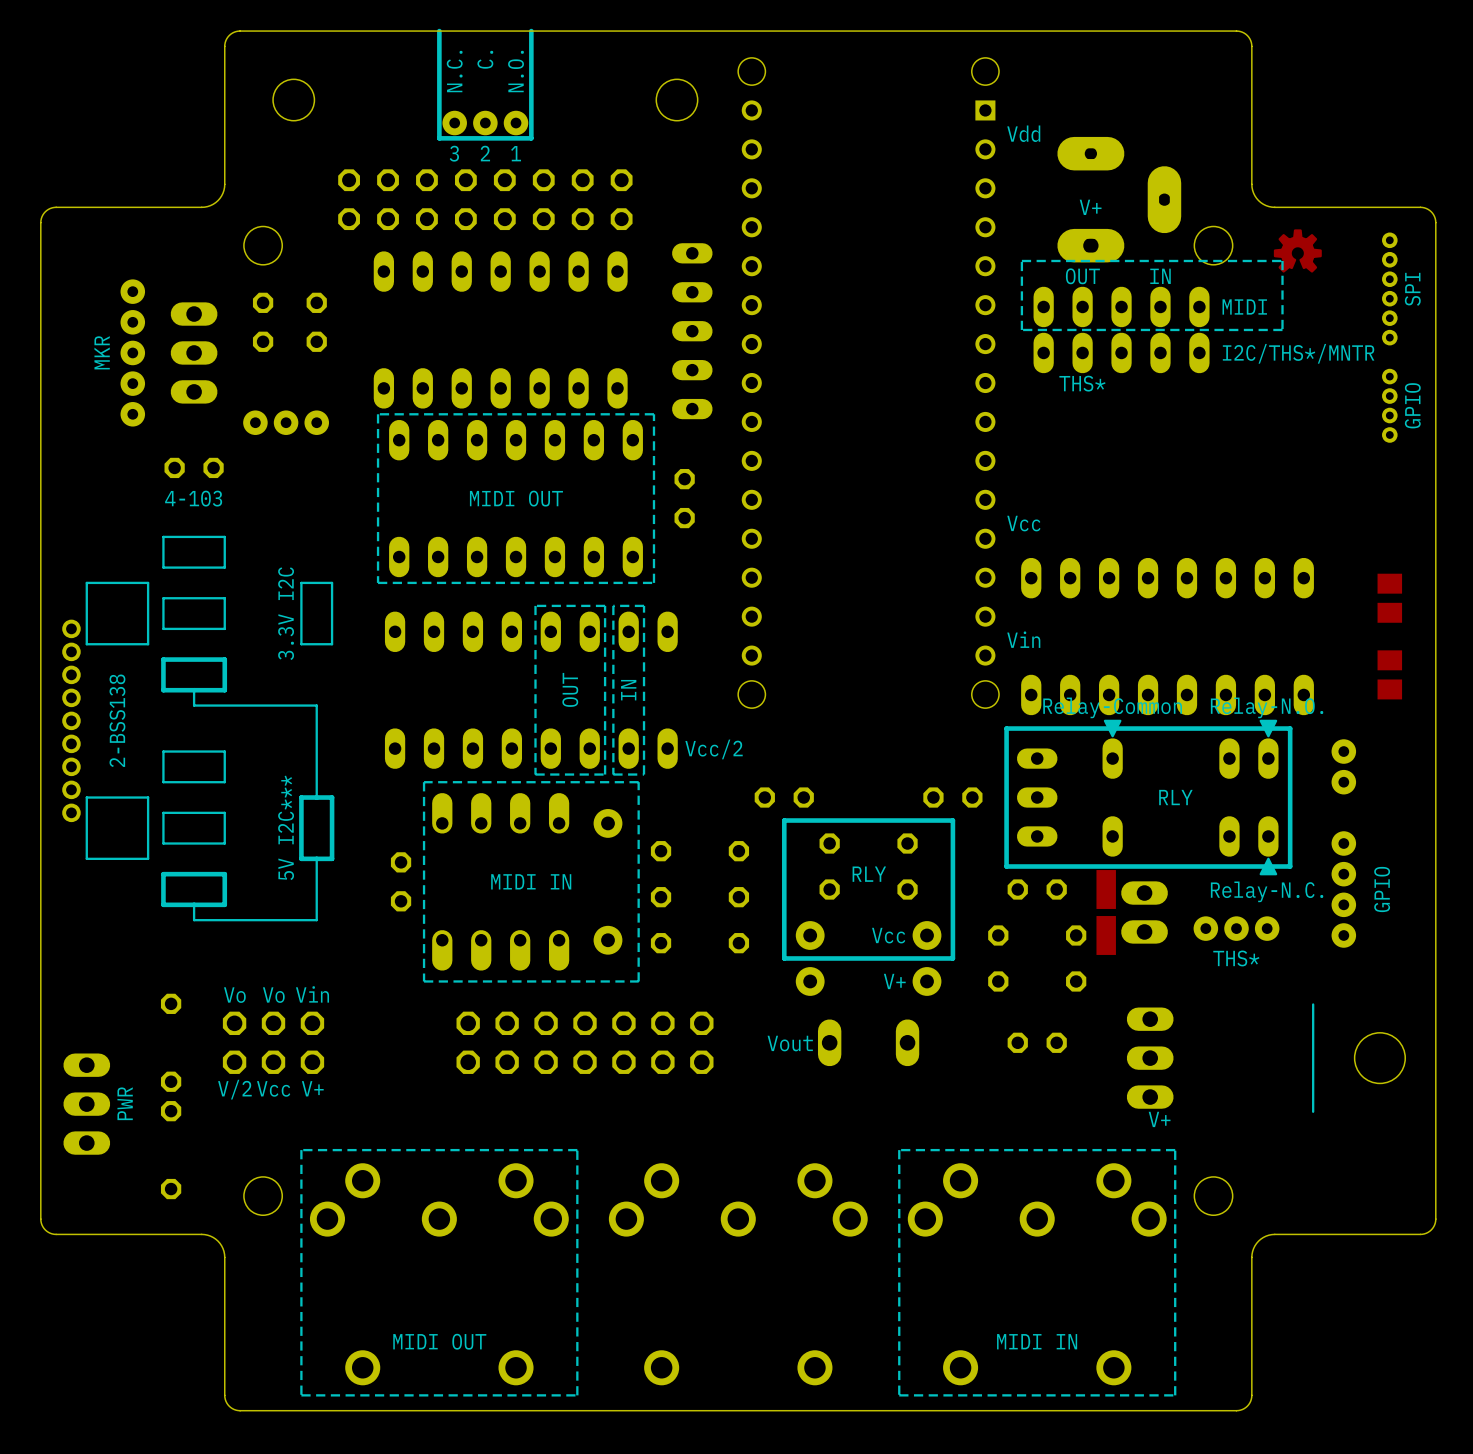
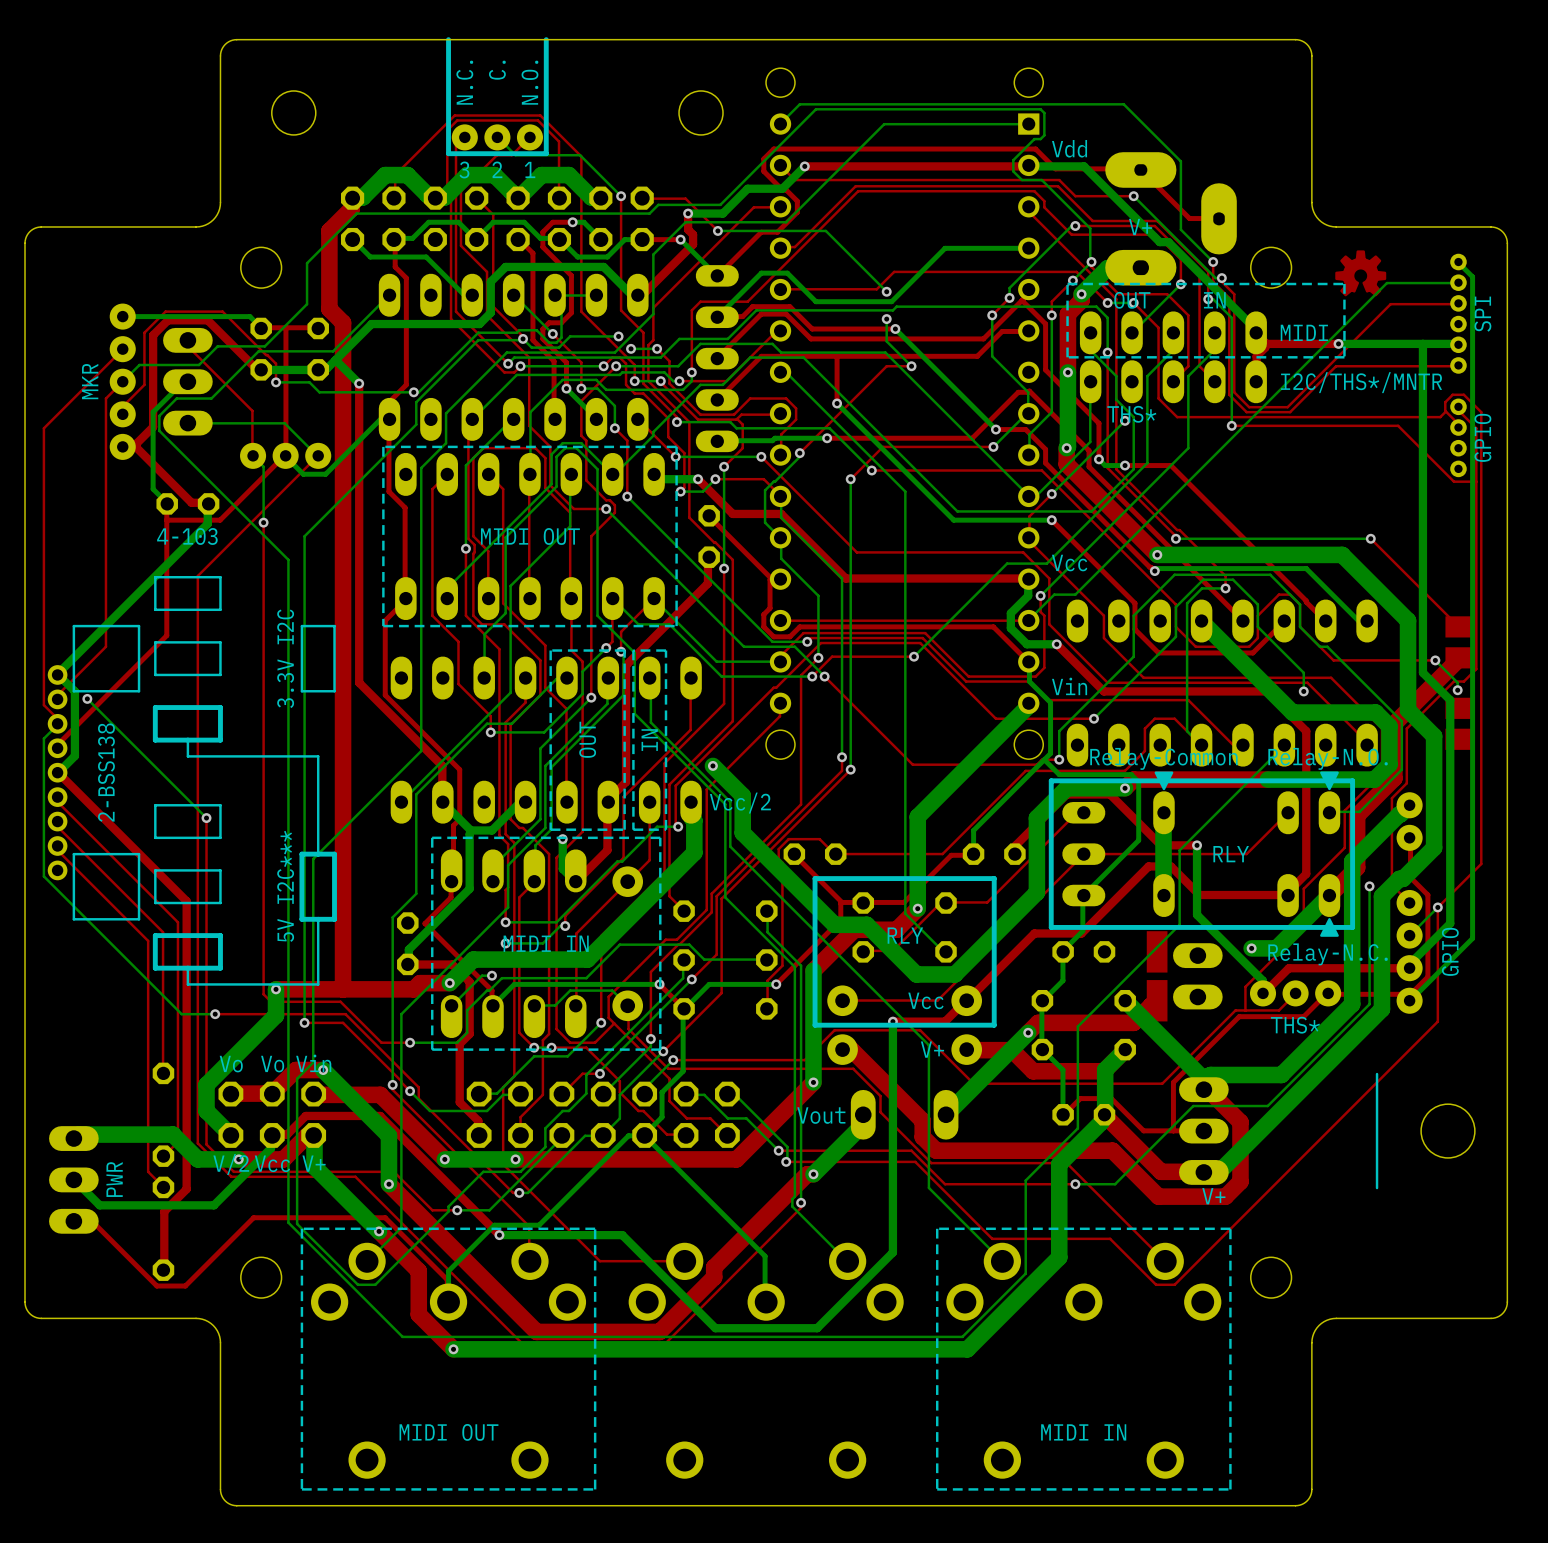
bottom track: none -> (780, 124) (799, 104) (1123, 104) (1180, 161) (1180, 229) (1213, 261)
bottom track: none -> (1028, 124) (884, 124) (786, 222) (685, 222) (653, 254) (653, 314) (614, 352) (506, 352) (446, 413) (446, 443) (421, 468) (421, 751) (313, 859) (313, 1062) (297, 1078) (297, 1223) (357, 1284) (375, 1284) (448, 1211) (448, 1206) (483, 1171) (520, 1171) (545, 1146) (545, 1128) (562, 1111) (568, 1111) (586, 1093) (586, 1075) (683, 978) (684, 960)
top track: none -> (464, 137) (456, 146) (456, 311) (508, 363)
bottom track: none -> (497, 137) (515, 155) (580, 155) (621, 196)
top track: none -> (529, 137) (511, 155) (496, 155) (460, 191) (460, 245) (487, 271) (487, 315) (529, 357) (529, 425) (550, 446) (550, 485) (573, 508) (606, 508)
top track: none -> (780, 165) (794, 180) (1059, 180) (1075, 196) (1133, 196)
top track: none -> (1028, 165) (804, 166)
bottom track: none -> (1028, 165) (1084, 166) (1159, 242) (1168, 242) (1255, 329) (1256, 332)
bottom track: none -> (804, 166) (782, 188) (747, 188) (722, 213) (688, 213)
via: none -> (804, 166)
top track: none -> (621, 196) (621, 310) (643, 332) (643, 383) (676, 417) (676, 422)
via: none -> (621, 196)
bottom track: none -> (1133, 196) (1215, 278) (1221, 278)
via: none -> (1133, 196)
top track: none -> (352, 198) (351, 208) (329, 230) (329, 309) (343, 322) (343, 989)
top track: none -> (393, 198) (395, 175) (454, 115) (540, 115) (581, 156) (581, 311) (634, 365) (634, 381)
top track: none -> (476, 198) (493, 214) (493, 306) (523, 336) (523, 338)
top track: none -> (559, 198) (559, 141) (537, 120) (457, 120) (447, 130) (447, 187) (451, 191) (451, 319) (504, 372) (514, 372) (520, 366)
bottom track: none -> (600, 198) (591, 197) (568, 175) (541, 175) (518, 198) (494, 175) (467, 175) (444, 197) (435, 198) (427, 194) (407, 175) (385, 175) (362, 197) (352, 198)
top track: none -> (642, 198) (685, 198) (717, 230)
top track: none -> (780, 206) (753, 207) (653, 307) (653, 340) (648, 345) (648, 381) (689, 422) (689, 517) (732, 559) (732, 721) (669, 784) (669, 896) (684, 911)
top track: none -> (1028, 206) (1029, 212) (1116, 299) (1116, 469) (1225, 576) (1225, 588)
top track: none -> (688, 213) (688, 229) (693, 234) (693, 244) (643, 294) (637, 295)
via: none -> (688, 213)
top track: none -> (1219, 218) (1189, 218) (1138, 168) (1055, 168) (1035, 149) (773, 149) (763, 158) (763, 171) (782, 189) (786, 189) (797, 201) (797, 212) (777, 232) (761, 232) (717, 275)
top track: none -> (572, 222) (552, 222) (542, 232) (542, 247) (571, 275) (571, 312) (561, 322) (549, 322) (542, 329) (542, 338) (566, 362) (566, 388)
bottom track: none -> (572, 222) (583, 222) (600, 239)
via: none -> (572, 222)
top track: none -> (1075, 225) (1154, 225) (1199, 270) (1199, 366) (1214, 381)
bottom track: none -> (1075, 225) (1071, 225) (1009, 288) (1009, 297)
via: none -> (1075, 225)
bottom track: none -> (717, 230) (825, 230) (886, 291)
via: none -> (717, 230)
bottom track: none -> (352, 239) (370, 257) (426, 257) (463, 294) (472, 295)
top track: none -> (393, 239) (395, 266) (406, 278) (406, 384) (390, 401) (388, 491) (405, 507) (405, 598) (385, 620) (385, 695) (459, 769) (459, 819) (453, 825) (453, 880) (451, 882) (451, 897) (424, 923) (492, 990) (493, 1005)
bottom track: none -> (393, 239) (412, 238) (428, 222) (458, 222) (476, 239) (493, 222) (524, 222) (540, 238) (559, 238) (577, 257) (607, 257) (624, 239) (642, 239)
top track: none -> (518, 239) (532, 253) (532, 340) (554, 361) (555, 419)
top track: none -> (642, 239) (680, 239)
bottom track: none -> (680, 239) (717, 275)
via: none -> (680, 239)
top track: none -> (780, 248) (794, 247) (855, 186) (1058, 186) (1092, 221) (1157, 221) (1208, 271) (1208, 299)
bottom track: none -> (1028, 248) (945, 248) (891, 301) (815, 301) (787, 273) (761, 273) (717, 317)
top track: none -> (1091, 261) (1091, 266) (1118, 294) (1167, 294) (1188, 315) (1188, 366) (1173, 381)
via: none -> (1091, 261)
top track: none -> (1213, 261) (1213, 281) (1229, 297) (1229, 394) (1246, 412) (1290, 412) (1336, 366) (1458, 365)
via: none -> (1213, 261)
bottom track: none -> (1458, 262) (1472, 276) (1472, 938) (1409, 1000)
bottom track: none -> (1140, 267) (1107, 268) (1081, 294)
top track: none -> (1221, 278) (1221, 281) (1234, 294) (1234, 392) (1249, 407) (1287, 407) (1390, 304) (1458, 303)
via: none -> (1221, 278)
top track: none -> (1072, 280) (1051, 301) (1051, 315)
bottom track: none -> (1072, 280) (1091, 261) (1090, 228) (1041, 180) (1022, 180) (1013, 171) (1013, 160) (1034, 139) (1040, 139) (1044, 135) (1044, 113) (1040, 109) (815, 109) (720, 204) (658, 204) (649, 213) (356, 213) (307, 263) (307, 304) (264, 346) (217, 346) (199, 365) (139, 365) (122, 381)
via: none -> (1072, 280)
bottom track: none -> (1458, 282) (1386, 283) (1075, 594) (1054, 594) (1028, 620)
top track: none -> (1180, 284) (1180, 259) (1156, 234) (1071, 234) (1044, 207) (1044, 201) (1034, 191) (858, 191) (747, 301) (700, 301) (691, 310) (691, 372)
bottom track: none -> (1180, 284) (1132, 332)
via: none -> (1180, 284)
top track: none -> (780, 289) (876, 289) (894, 271) (1076, 271) (1107, 302)
top track: none -> (1028, 289) (1028, 294) (983, 338) (811, 338) (786, 314) (761, 314) (717, 358)
via: none -> (886, 291)
top track: none -> (1081, 294) (1081, 300) (1067, 314) (1067, 372)
via: none -> (1081, 294)
bottom track: none -> (389, 295) (333, 351) (258, 351) (211, 398) (176, 398) (159, 415) (159, 430) (288, 559) (288, 1222) (402, 1336) (962, 1336) (1025, 1273) (1025, 1180) (1077, 1128) (1077, 1026) (1179, 924) (1179, 850) (1284, 745)
bottom track: none -> (513, 295) (552, 333)
bottom track: none -> (596, 295) (555, 295) (561, 295) (561, 337) (556, 342) (549, 342) (536, 330) (519, 330) (516, 332) (478, 332) (418, 392) (319, 392) (309, 382) (276, 382)
bottom track: none -> (637, 295) (631, 294) (603, 266) (505, 266) (490, 281) (490, 312) (479, 324) (371, 324) (326, 368) (261, 369)
top track: none -> (1009, 297) (992, 315)
via: none -> (1009, 297)
bottom track: none -> (1208, 299) (1213, 299) (1231, 317) (1231, 425)
via: none -> (1208, 299)
top track: none -> (1022, 300) (1045, 324) (1045, 369) (1098, 423) (1098, 459)
via: none -> (1107, 302)
top track: none -> (1133, 302) (1158, 327) (1158, 398) (1177, 417) (1440, 417) (1445, 411)
bottom track: none -> (1133, 302) (1107, 302)
via: none -> (1133, 302)
bottom track: none -> (992, 315) (992, 356) (1028, 392) (1028, 413) (993, 446)
via: none -> (992, 315)
bottom track: none -> (1051, 315) (1051, 412) (1029, 434) (1028, 455)
via: none -> (1051, 315)
bottom track: none -> (122, 316) (249, 316) (261, 328)
top track: none -> (717, 317) (742, 316) (752, 306) (789, 306) (812, 329) (895, 329)
bottom track: none -> (886, 319) (886, 341) (911, 366)
via: none -> (886, 319)
top track: none -> (285, 327) (285, 455) (220, 520) (166, 520)
top track: none -> (318, 328) (261, 328)
bottom track: none -> (895, 329) (995, 429)
via: none -> (895, 329)
top track: none -> (780, 330) (776, 331) (726, 381) (679, 381)
top track: none -> (1028, 330) (1002, 331) (977, 356) (761, 356) (717, 399)
bottom track: none -> (1090, 332) (1091, 351) (1116, 376) (1116, 399) (1133, 417) (1133, 469) (1091, 511) (957, 511) (803, 357) (750, 357) (722, 384) (700, 384) (613, 475) (581, 443) (562, 443) (551, 454) (551, 484) (447, 588) (447, 598)
bottom track: none -> (1173, 332) (1172, 351) (1147, 376) (1147, 463) (1046, 563) (1007, 563) (914, 656)
bottom track: none -> (1214, 332) (1214, 350) (1188, 376) (1188, 448) (1040, 595)
top track: none -> (552, 333) (581, 362) (581, 388)
via: none -> (552, 333)
bottom track: none -> (618, 336) (570, 336) (559, 347) (531, 347) (523, 338) (478, 340) (416, 402) (416, 424) (304, 536) (304, 1022)
via: none -> (618, 336)
via: none -> (523, 338)
top track: none -> (187, 340) (189, 347) (252, 410) (253, 455)
top track: none -> (1338, 343) (1266, 343) (1256, 332) (1265, 347) (1256, 356) (1256, 381)
bottom track: none -> (1338, 343) (1458, 344)
via: none -> (1338, 343)
bottom track: none -> (1422, 343) (1422, 672) (1450, 700) (1450, 923) (1410, 963) (1409, 968)
top track: none -> (122, 349) (43, 428) (43, 705) (57, 718) (57, 723)
via: none -> (631, 348)
top track: none -> (657, 348) (669, 361) (669, 383) (700, 414) (734, 414) (750, 398) (786, 398) (796, 408) (796, 419) (781, 434) (780, 455)
bottom track: none -> (657, 348) (631, 348)
via: none -> (657, 348)
top track: none -> (1107, 352) (1107, 468) (1175, 536) (1175, 538)
bottom track: none -> (1107, 352) (1107, 317) (1096, 306) (896, 306) (892, 310) (756, 310) (727, 338) (679, 338) (660, 357) (514, 357) (508, 363)
via: none -> (1107, 352)
top track: none -> (837, 356) (837, 403)
bottom track: none -> (335, 360) (359, 383)
via: none -> (508, 363)
via: none -> (520, 366)
top track: none -> (603, 366) (612, 357) (619, 357) (626, 363) (626, 384) (634, 393) (643, 393) (668, 418) (668, 436) (684, 453) (684, 487) (680, 491)
bottom track: none -> (603, 366) (520, 366)
via: none -> (603, 366)
top track: none -> (616, 366) (581, 401) (581, 435) (586, 440) (586, 480) (606, 500) (609, 500) (614, 505) (614, 512) (591, 536) (591, 697)
bottom track: none -> (616, 366) (678, 366) (700, 343) (772, 343) (781, 352) (885, 352) (1028, 496) (1036, 495) (1090, 441) (1090, 381)
via: none -> (616, 366)
top track: none -> (911, 366) (886, 366) (799, 453)
via: none -> (911, 366)
top track: none -> (261, 369) (256, 368) (207, 320) (168, 320) (153, 335) (153, 427) (137, 443) (135, 446)
bottom track: none -> (691, 372) (691, 381) (683, 389) (606, 389) (596, 379) (562, 379) (530, 412) (529, 474)
via: none -> (691, 372)
bottom track: none -> (780, 372) (786, 372) (905, 491) (905, 913) (942, 950) (946, 951)
bottom track: none -> (1067, 372) (1066, 448)
via: none -> (1067, 372)
top track: none -> (122, 381) (105, 398) (105, 646) (58, 693) (57, 699)
bottom track: none -> (187, 381) (182, 382) (153, 412) (153, 489) (167, 503)
via: none -> (634, 381)
top track: none -> (660, 381) (698, 419) (736, 419) (741, 414) (780, 413)
bottom track: none -> (660, 381) (634, 381)
via: none -> (660, 381)
bottom track: none -> (679, 381) (673, 381) (664, 372) (622, 372) (619, 374) (516, 374) (472, 419)
via: none -> (679, 381)
top track: none -> (276, 382) (276, 363) (222, 311) (165, 311) (144, 332) (144, 384) (123, 405) (122, 414)
via: none -> (276, 382)
top track: none -> (359, 383) (359, 682) (442, 765) (442, 802)
via: none -> (359, 383)
bottom track: none -> (566, 388) (596, 419)
via: none -> (566, 388)
bottom track: none -> (581, 388) (597, 388) (614, 405) (614, 428)
via: none -> (581, 388)
via: none -> (413, 392)
bottom track: none -> (837, 403) (953, 520) (1051, 520)
via: none -> (837, 403)
top track: none -> (1458, 406) (1458, 410) (1476, 428) (1476, 669) (1463, 681) (1453, 681) (1406, 728) (1406, 783) (1391, 798) (1391, 885) (1409, 903)
bottom track: none -> (389, 419) (380, 419) (325, 474) (303, 474) (285, 455)
top track: none -> (472, 419) (468, 419) (468, 538) (474, 544) (473, 615) (482, 624) (504, 624) (540, 660) (540, 695) (510, 724) (510, 819) (519, 827) (523, 827) (549, 854) (549, 1034) (542, 1040) (542, 1094) (520, 1117) (520, 1135)
bottom track: none -> (513, 419) (465, 465) (465, 548)
top track: none -> (637, 419) (675, 456)
top track: none -> (737, 418) (742, 424) (742, 448) (724, 466)
bottom track: none -> (1125, 420) (1051, 494)
via: none -> (1125, 420)
bottom track: none -> (676, 422) (730, 422) (736, 428) (829, 428) (871, 470)
via: none -> (676, 422)
bottom track: none -> (187, 423) (284, 423) (318, 455)
top track: none -> (1231, 425) (1398, 425) (1453, 481) (1476, 481)
via: none -> (1231, 425)
top track: none -> (614, 428) (627, 440) (627, 496)
via: none -> (614, 428)
top track: none -> (1458, 427) (1457, 423) (1445, 410) (1445, 402) (1452, 394) (1463, 394) (1481, 412) (1481, 863) (1437, 907) (1437, 1021) (1174, 1284) (1156, 1284) (1110, 1238) (992, 1238) (915, 1161) (786, 1161)
top track: none -> (995, 429) (1025, 429) (1045, 449) (1045, 463) (1154, 571)
via: none -> (995, 429)
top track: none -> (827, 438) (972, 438) (1018, 392) (1029, 391) (1089, 450) (1089, 466) (1242, 621)
bottom track: none -> (827, 438) (717, 441)
via: none -> (827, 438)
top track: none -> (135, 446) (191, 502) (208, 503)
top track: none -> (993, 446) (882, 446) (850, 479)
via: none -> (993, 446)
top track: none -> (1066, 448) (1066, 464) (1157, 554)
via: none -> (1066, 448)
bottom track: none -> (799, 453) (799, 456) (765, 490) (765, 522) (781, 538) (781, 558) (818, 595) (818, 657)
via: none -> (799, 453)
bottom track: none -> (253, 455) (263, 466) (263, 522)
top track: none -> (318, 455) (197, 576) (197, 1143) (231, 1176) (355, 1176) (523, 1344) (664, 1344) (801, 1207) (801, 1202)
via: none -> (675, 456)
top track: none -> (761, 456) (856, 552) (1023, 552) (1049, 578) (1049, 624) (1107, 682) (1307, 682) (1367, 742) (1367, 745)
bottom track: none -> (761, 456) (675, 456)
via: none -> (761, 456)
bottom track: none -> (1098, 459) (1105, 465) (1125, 465)
via: none -> (1098, 459)
top track: none -> (1125, 465) (1170, 465) (1325, 621)
via: none -> (1125, 465)
bottom track: none -> (724, 466) (724, 568)
via: none -> (724, 466)
top track: none -> (871, 470) (1041, 470) (1175, 604) (1175, 626) (1195, 646) (1249, 646) (1257, 638) (1257, 615) (1278, 594) (1290, 594) (1300, 604) (1300, 626) (1333, 660) (1435, 660)
via: none -> (871, 470)
top track: none -> (447, 474) (432, 489) (432, 615) (458, 641) (458, 684) (490, 716) (490, 732)
top track: none -> (488, 474) (503, 489) (503, 603) (545, 645) (545, 687) (566, 708) (566, 802)
top track: none -> (529, 474) (529, 598)
bottom track: none -> (571, 474) (570, 526) (510, 585) (510, 692) (401, 801)
bottom track: none -> (654, 474) (658, 479) (698, 479)
top track: none -> (698, 479) (732, 513) (781, 513) (845, 578) (1028, 579)
via: none -> (698, 479)
top track: none -> (715, 479) (763, 479) (780, 496)
bottom track: none -> (715, 479) (703, 491) (680, 491)
via: none -> (715, 479)
bottom track: none -> (850, 479) (850, 769)
via: none -> (850, 479)
via: none -> (680, 491)
top track: none -> (1051, 494) (1029, 516) (1029, 541) (1103, 615) (1103, 638) (1143, 677) (1331, 677) (1381, 728) (1381, 773) (1344, 810) (1344, 847) (1303, 888) (1303, 928) (1245, 986) (1245, 1010)
via: none -> (1051, 494)
bottom track: none -> (780, 496) (781, 517) (842, 578) (842, 757)
bottom track: none -> (627, 496) (772, 641) (807, 641)
via: none -> (627, 496)
top track: none -> (167, 503) (166, 635) (58, 743) (57, 748)
bottom track: none -> (208, 503) (207, 523) (57, 674) (74, 691) (74, 756) (57, 772)
bottom track: none -> (606, 508) (743, 646) (794, 646) (824, 676)
via: none -> (606, 508)
top track: none -> (709, 515) (771, 578) (780, 579) (770, 579) (770, 608) (763, 614) (763, 626) (773, 636) (789, 636) (799, 626) (993, 626) (1028, 661)
top track: none -> (1051, 520) (1134, 603) (1134, 629) (1158, 652) (1252, 652) (1284, 621)
via: none -> (1051, 520)
top track: none -> (263, 522) (263, 994) (271, 1001) (340, 1001) (381, 1042) (410, 1042)
via: none -> (263, 522)
via: none -> (1175, 538)
top track: none -> (1370, 538) (1458, 626)
bottom track: none -> (1370, 538) (1175, 538)
via: none -> (1370, 538)
top track: none -> (465, 548) (465, 615) (499, 649) (499, 835) (508, 844) (505, 922)
via: none -> (465, 548)
bottom track: none -> (1157, 554) (1342, 554) (1408, 620) (1408, 710) (1434, 736) (1434, 847) (1403, 878) (1399, 878) (1381, 896) (1381, 1009) (1219, 1171) (1203, 1172)
via: none -> (1157, 554)
top track: none -> (709, 557) (707, 583) (626, 665) (626, 782) (607, 803) (607, 850) (575, 881)
top track: none -> (724, 568) (724, 703) (664, 763) (664, 872) (601, 935) (601, 1022)
via: none -> (724, 568)
bottom track: none -> (1154, 571) (1157, 568) (1306, 568) (1358, 620) (1367, 621)
via: none -> (1154, 571)
bottom track: none -> (1028, 579) (1028, 595) (1010, 613) (1010, 628) (1026, 644) (1056, 644)
bottom track: none -> (1225, 588) (1201, 588) (1187, 603) (1187, 731) (1201, 745)
via: none -> (1225, 588)
top track: none -> (1040, 595) (1040, 612) (1044, 615) (1044, 667) (1035, 676) (968, 676) (925, 633) (803, 633) (781, 655) (780, 661)
via: none -> (1040, 595)
top track: none -> (488, 598) (488, 551) (473, 536) (473, 458) (483, 448) (535, 448) (545, 458) (545, 487) (570, 512) (571, 650) (582, 661) (582, 831) (556, 857) (556, 1029) (570, 1042) (595, 1042) (614, 1023)
top track: none -> (612, 598) (612, 641) (606, 648)
bottom track: none -> (612, 598) (638, 624) (669, 624) (721, 676) (812, 676)
top track: none -> (654, 598) (621, 631) (621, 651)
bottom track: none -> (654, 598) (716, 661) (780, 661)
top track: none -> (1028, 620) (780, 620)
bottom track: none -> (1201, 621) (1292, 712) (1375, 712) (1389, 726) (1389, 764) (1374, 779) (1267, 779)
top track: none -> (807, 641) (811, 638) (922, 638) (966, 681) (1028, 681) (1046, 700) (1188, 700) (1233, 744) (1242, 745)
via: none -> (807, 641)
top track: none -> (1056, 644) (1103, 691) (1266, 691) (1306, 731) (1306, 873) (1288, 891) (1288, 895) (1199, 895) (1170, 866) (1148, 866) (1081, 933) (1034, 933) (945, 1021) (892, 1021)
via: none -> (1056, 644)
bottom track: none -> (606, 648) (582, 671) (582, 693) (544, 732) (490, 732)
via: none -> (606, 648)
bottom track: none -> (621, 651) (623, 654) (623, 695) (551, 767) (551, 829) (535, 845) (534, 881)
via: none -> (621, 651)
top track: none -> (914, 656) (832, 656) (812, 676)
via: none -> (914, 656)
top track: none -> (818, 657) (801, 675) (801, 804) (711, 893) (711, 912) (650, 971) (650, 1039)
via: none -> (818, 657)
top track: none -> (1458, 657) (1394, 723) (1394, 778) (1357, 815) (1357, 867) (1329, 895)
bottom track: none -> (1435, 660) (1457, 682) (1457, 690)
via: none -> (1435, 660)
bottom track: none -> (1028, 661) (1029, 681) (1050, 702) (1050, 753) (973, 830) (973, 854)
via: none -> (812, 676)
top track: none -> (824, 676) (912, 764) (1036, 764) (1041, 759) (1059, 759)
via: none -> (824, 676)
bottom track: none -> (484, 678) (484, 634) (505, 613) (505, 537) (556, 486) (556, 456) (565, 448) (576, 448) (597, 469) (597, 615) (634, 652) (634, 713) (725, 804) (725, 897) (794, 967) (794, 1196) (792, 1199) (792, 1206) (847, 1261)
top track: none -> (525, 678) (525, 702) (505, 722) (505, 834) (514, 842) (514, 1076) (503, 1087) (503, 1164) (599, 1261) (684, 1261)
bottom track: none -> (566, 678) (556, 679) (511, 723) (487, 723) (416, 794) (416, 893) (392, 917) (392, 1084)
bottom track: none -> (608, 678) (607, 703) (545, 765) (545, 827) (508, 865) (508, 907) (401, 1014) (401, 1227) (367, 1261)
bottom track: none -> (649, 678) (650, 722) (730, 801) (730, 846) (928, 1045) (928, 1187) (1002, 1261)
top track: none -> (691, 678) (690, 729) (623, 796) (623, 857) (565, 916) (565, 926)
via: none -> (1457, 690)
bottom track: none -> (1303, 691) (1303, 672) (1257, 626) (1257, 604) (1233, 579) (1203, 579) (1175, 607) (1175, 636) (1094, 718)
via: none -> (1303, 691)
bottom track: none -> (591, 697) (540, 748) (540, 819) (493, 866) (493, 881)
via: none -> (591, 697)
bottom track: none -> (87, 698) (206, 818)
via: none -> (87, 698)
top track: none -> (780, 703) (779, 716) (706, 789) (706, 909) (676, 939) (665, 939) (608, 996) (608, 1017) (669, 1078) (669, 1101) (686, 1118) (710, 1118) (727, 1135)
bottom track: none -> (1028, 703) (1028, 706) (917, 816) (917, 908)
top track: none -> (1094, 718) (995, 718) (920, 643) (820, 643) (675, 785) (675, 824) (678, 826)
via: none -> (1094, 718)
bottom track: none -> (57, 723) (43, 738) (43, 876) (181, 1014) (215, 1014)
via: none -> (490, 732)
top track: none -> (1201, 745) (1174, 718) (1154, 718) (1144, 728) (1144, 751) (1125, 770) (1025, 770) (942, 854) (835, 854)
top track: none -> (842, 757) (842, 770) (716, 896) (716, 954) (691, 979)
via: none -> (842, 757)
bottom track: none -> (1044, 759) (1059, 774) (1131, 774) (1138, 782) (1138, 840) (1082, 896) (1082, 931) (1063, 951)
bottom track: none -> (1059, 759) (1059, 731) (1133, 656) (1133, 615) (1174, 574) (1270, 574) (1300, 604) (1300, 626) (1319, 646) (1327, 646) (1401, 721) (1401, 769) (1359, 811) (1329, 812)
via: none -> (1059, 759)
bottom track: none -> (712, 765) (742, 795) (742, 832) (834, 924) (866, 924) (916, 974) (954, 974) (1036, 892) (1036, 818) (1066, 788) (1125, 788)
via: none -> (712, 765)
top track: none -> (850, 769) (721, 898) (721, 993) (663, 1051)
via: none -> (850, 769)
top track: none -> (57, 772) (186, 901) (186, 1189) (164, 1211) (163, 1270)
top track: none -> (1267, 779) (1133, 779) (1125, 788)
via: none -> (1125, 788)
top track: none -> (57, 797) (58, 803) (177, 922) (177, 1142) (163, 1156)
bottom track: none -> (442, 802) (470, 830)
bottom track: none -> (525, 802) (519, 803) (492, 830) (470, 830)
top track: none -> (649, 802) (649, 860) (576, 933) (575, 1005)
bottom track: none -> (691, 802) (691, 818) (694, 820) (694, 852) (587, 959) (473, 959) (449, 983)
bottom track: none -> (1409, 805) (1352, 861) (1352, 1004) (1281, 1075) (1210, 1075) (1203, 1078)
top track: none -> (1083, 812) (1076, 813) (987, 902) (940, 903) (892, 950) (863, 951)
bottom track: none -> (1163, 812) (1163, 895)
top track: none -> (1288, 812) (1246, 854) (1084, 854)
top track: none -> (206, 818) (206, 1144) (233, 1171) (393, 1171) (432, 1210) (457, 1210)
via: none -> (206, 818)
top track: none -> (57, 821) (58, 827) (163, 932) (163, 1073)
bottom track: none -> (678, 826) (657, 826) (622, 861) (617, 861) (556, 922) (505, 922)
via: none -> (678, 826)
bottom track: none -> (470, 830) (469, 888) (408, 949) (407, 964)
top track: none -> (1409, 837) (1410, 877) (1427, 895) (1427, 976) (1408, 996) (1409, 1000) (1403, 994) (1328, 993) (1303, 1016) (1239, 1016) (1173, 1082) (1173, 1130)
bottom track: none -> (562, 839) (562, 868) (575, 881)
via: none -> (562, 839)
top track: none -> (57, 845) (58, 851) (148, 940) (148, 1171) (163, 1187)
top track: none -> (1197, 845) (1161, 845) (1110, 794) (1066, 794) (1015, 845) (1014, 854)
bottom track: none -> (1197, 845) (1197, 914) (1262, 980) (1263, 993)
via: none -> (1197, 845)
top track: none -> (794, 854) (842, 902)
top track: none -> (835, 854) (819, 839) (788, 839) (778, 849) (778, 859) (782, 862) (782, 965) (767, 980) (766, 1008)
top track: none -> (973, 854) (951, 855) (904, 902) (842, 902)
top track: none -> (1083, 854) (937, 1000) (842, 1000)
top track: none -> (534, 881) (519, 897) (519, 1032) (534, 1047)
bottom track: none -> (1369, 886) (1369, 1004) (1267, 1106) (1193, 1106) (1115, 1184) (1075, 1184)
via: none -> (1369, 886)
bottom track: none -> (1329, 895) (1276, 948) (1251, 948)
top track: none -> (842, 902) (840, 919) (776, 984)
bottom track: none -> (1437, 907) (1409, 935)
via: none -> (1437, 907)
top track: none -> (917, 908) (896, 929) (854, 929) (813, 970)
via: none -> (917, 908)
bottom track: none -> (766, 911) (767, 932) (801, 965) (801, 1202)
via: none -> (505, 922)
bottom track: none -> (565, 926) (560, 926) (542, 943) (505, 943)
via: none -> (565, 926)
via: none -> (505, 943)
via: none -> (1251, 948)
bottom track: none -> (1062, 952) (1062, 980) (1041, 1001) (1041, 1047) (1062, 1070) (1062, 1114)
bottom track: none -> (766, 960) (704, 959) (689, 944) (619, 944) (586, 978) (501, 978) (467, 1010) (467, 1032) (457, 1042) (410, 1042)
top track: none -> (407, 964) (452, 964) (469, 981) (469, 1034) (459, 1043) (459, 1102) (478, 1120) (479, 1135)
top track: none -> (1409, 968) (1288, 968) (1263, 993)
bottom track: none -> (813, 970) (813, 1082)
bottom track: none -> (492, 975) (482, 975) (451, 1005)
via: none -> (492, 975)
bottom track: none -> (691, 979) (599, 1071) (599, 1073)
via: none -> (691, 979)
top track: none -> (449, 983) (420, 983) (413, 989) (276, 989)
via: none -> (449, 983)
top track: none -> (659, 984) (684, 1008)
bottom track: none -> (659, 984) (514, 984) (493, 1005)
via: none -> (659, 984)
bottom track: none -> (776, 984) (709, 984) (683, 1009) (683, 1071) (662, 1092) (662, 1117) (644, 1135)
via: none -> (776, 984)
bottom track: none -> (276, 989) (276, 1015) (206, 1084) (206, 1111) (230, 1135)
via: none -> (276, 989)
top track: none -> (1295, 993) (1278, 1010) (1235, 1010) (1162, 1083) (973, 1083) (920, 1030) (834, 1030) (804, 1060) (673, 1060)
bottom track: none -> (1125, 1000) (1203, 1078)
top track: none -> (1157, 1000) (1133, 1022) (1038, 1022) (1028, 1032)
top track: none -> (627, 1005) (628, 1029) (668, 1068) (853, 1068) (880, 1096) (880, 1112) (931, 1163) (1066, 1163) (1165, 1261)
bottom track: none -> (627, 1005) (612, 990) (570, 990) (555, 1005) (534, 1005)
top track: none -> (215, 1014) (345, 1014) (418, 1087) (418, 1098) (513, 1192) (519, 1192)
via: none -> (215, 1014)
bottom track: none -> (892, 1021) (892, 1252) (817, 1328) (715, 1328) (622, 1235) (499, 1235)
via: none -> (892, 1021)
top track: none -> (304, 1022) (343, 1022) (410, 1091)
via: none -> (304, 1022)
bottom track: none -> (601, 1022) (567, 1056) (534, 1056) (496, 1093) (479, 1094)
via: none -> (601, 1022)
bottom track: none -> (1028, 1032) (946, 1114)
via: none -> (1028, 1032)
bottom track: none -> (650, 1039) (650, 1046) (603, 1094)
via: none -> (650, 1039)
via: none -> (410, 1042)
via: none -> (534, 1047)
top track: none -> (551, 1047) (586, 1047) (619, 1081) (619, 1092) (638, 1111) (643, 1111) (667, 1134) (686, 1135)
bottom track: none -> (551, 1047) (534, 1047)
via: none -> (551, 1047)
top track: none -> (842, 1049) (851, 1050) (922, 1120) (922, 1137) (936, 1150) (1112, 1150) (1158, 1196) (1225, 1196) (1240, 1181) (1240, 1122) (1208, 1089) (1203, 1089)
top track: none -> (1125, 1049) (1103, 1071) (1033, 1071) (1012, 1050) (966, 1049)
bottom track: none -> (1125, 1049) (1105, 1070) (1105, 1114) (1101, 1122) (1059, 1164) (1059, 1257) (967, 1349) (453, 1349)
bottom track: none -> (663, 1051) (619, 1094) (619, 1118) (603, 1135) (585, 1135) (527, 1192) (519, 1192)
via: none -> (663, 1051)
bottom track: none -> (673, 1060) (644, 1088) (644, 1094)
via: none -> (673, 1060)
top track: none -> (323, 1070) (295, 1070) (272, 1094) (230, 1094)
bottom track: none -> (323, 1070) (388, 1135) (388, 1184)
via: none -> (323, 1070)
top track: none -> (599, 1073) (582, 1073) (561, 1094)
via: none -> (599, 1073)
top track: none -> (813, 1082) (736, 1159) (515, 1159)
via: none -> (813, 1082)
top track: none -> (392, 1084) (392, 1089) (529, 1226) (529, 1261)
via: none -> (392, 1084)
bottom track: none -> (410, 1091) (429, 1111) (487, 1111) (503, 1094) (520, 1094)
via: none -> (410, 1091)
top track: none -> (313, 1094) (380, 1094) (444, 1159)
bottom track: none -> (686, 1094) (704, 1094) (727, 1118) (746, 1118) (778, 1150)
bottom track: none -> (727, 1094) (735, 1094) (787, 1146) (786, 1161)
bottom track: none -> (863, 1114) (863, 1124) (813, 1174)
top track: none -> (1063, 1114) (1080, 1098) (1111, 1098) (1143, 1130) (1203, 1131)
top track: none -> (1104, 1114) (1161, 1171) (1203, 1172)
top track: none -> (272, 1135) (287, 1134) (305, 1115) (380, 1115) (499, 1235)
bottom track: none -> (272, 1135) (271, 1148) (213, 1205) (99, 1205) (73, 1179)
top track: none -> (313, 1135) (307, 1135) (283, 1159) (238, 1159)
bottom track: none -> (313, 1135) (314, 1166) (379, 1231)
bottom track: none -> (561, 1135) (561, 1138) (489, 1210) (457, 1210)
bottom track: none -> (644, 1135) (765, 1256) (766, 1302)
bottom track: none -> (644, 1135) (628, 1135) (539, 1225) (494, 1225) (448, 1271) (448, 1302)
bottom track: none -> (73, 1138) (78, 1134) (172, 1134) (197, 1159) (238, 1159)
top track: none -> (778, 1150) (911, 1150) (945, 1184) (1075, 1184)
via: none -> (778, 1150)
via: none -> (238, 1159)
via: none -> (444, 1159)
bottom track: none -> (515, 1159) (444, 1159)
via: none -> (515, 1159)
via: none -> (786, 1161)
top track: none -> (813, 1174) (807, 1174) (714, 1267) (714, 1277) (659, 1331) (536, 1331) (388, 1184)
via: none -> (813, 1174)
via: none -> (388, 1184)
via: none -> (1075, 1184)
via: none -> (519, 1192)
via: none -> (801, 1202)
via: none -> (457, 1210)
top track: none -> (73, 1221) (92, 1221) (156, 1286) (185, 1286) (253, 1217) (385, 1217) (447, 1279) (448, 1302)
top track: none -> (379, 1231) (418, 1271) (418, 1314) (453, 1349)
via: none -> (379, 1231)
via: none -> (499, 1235)
via: none -> (453, 1349)

